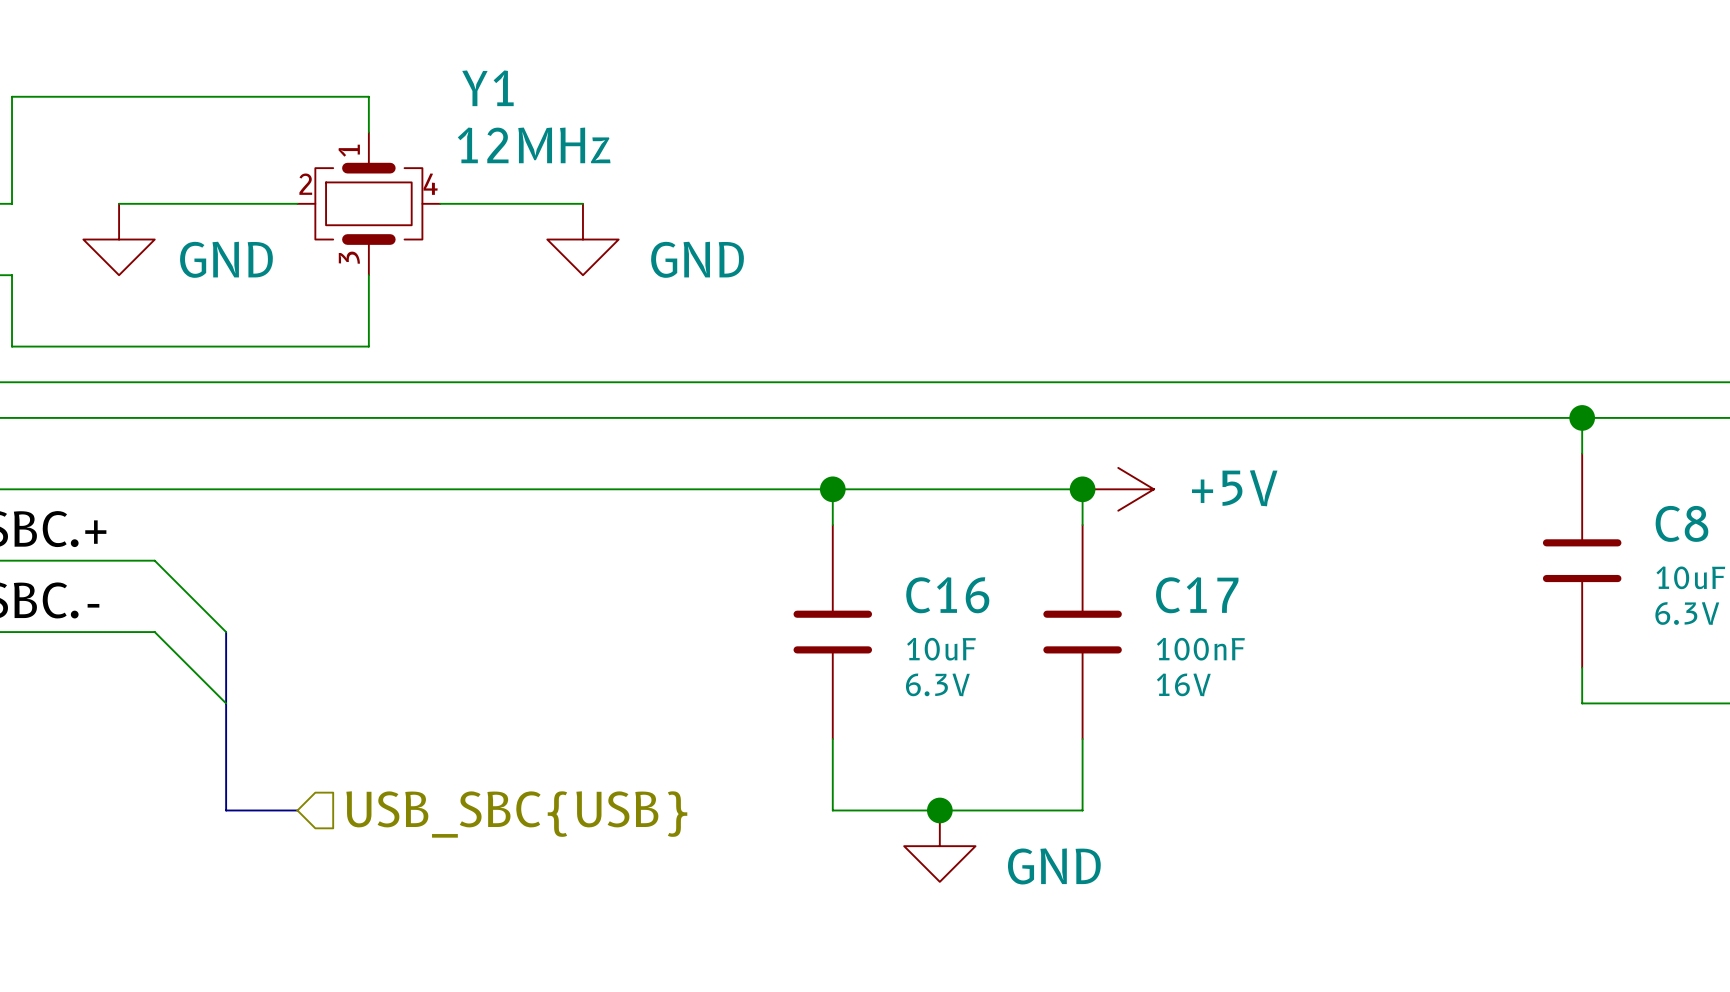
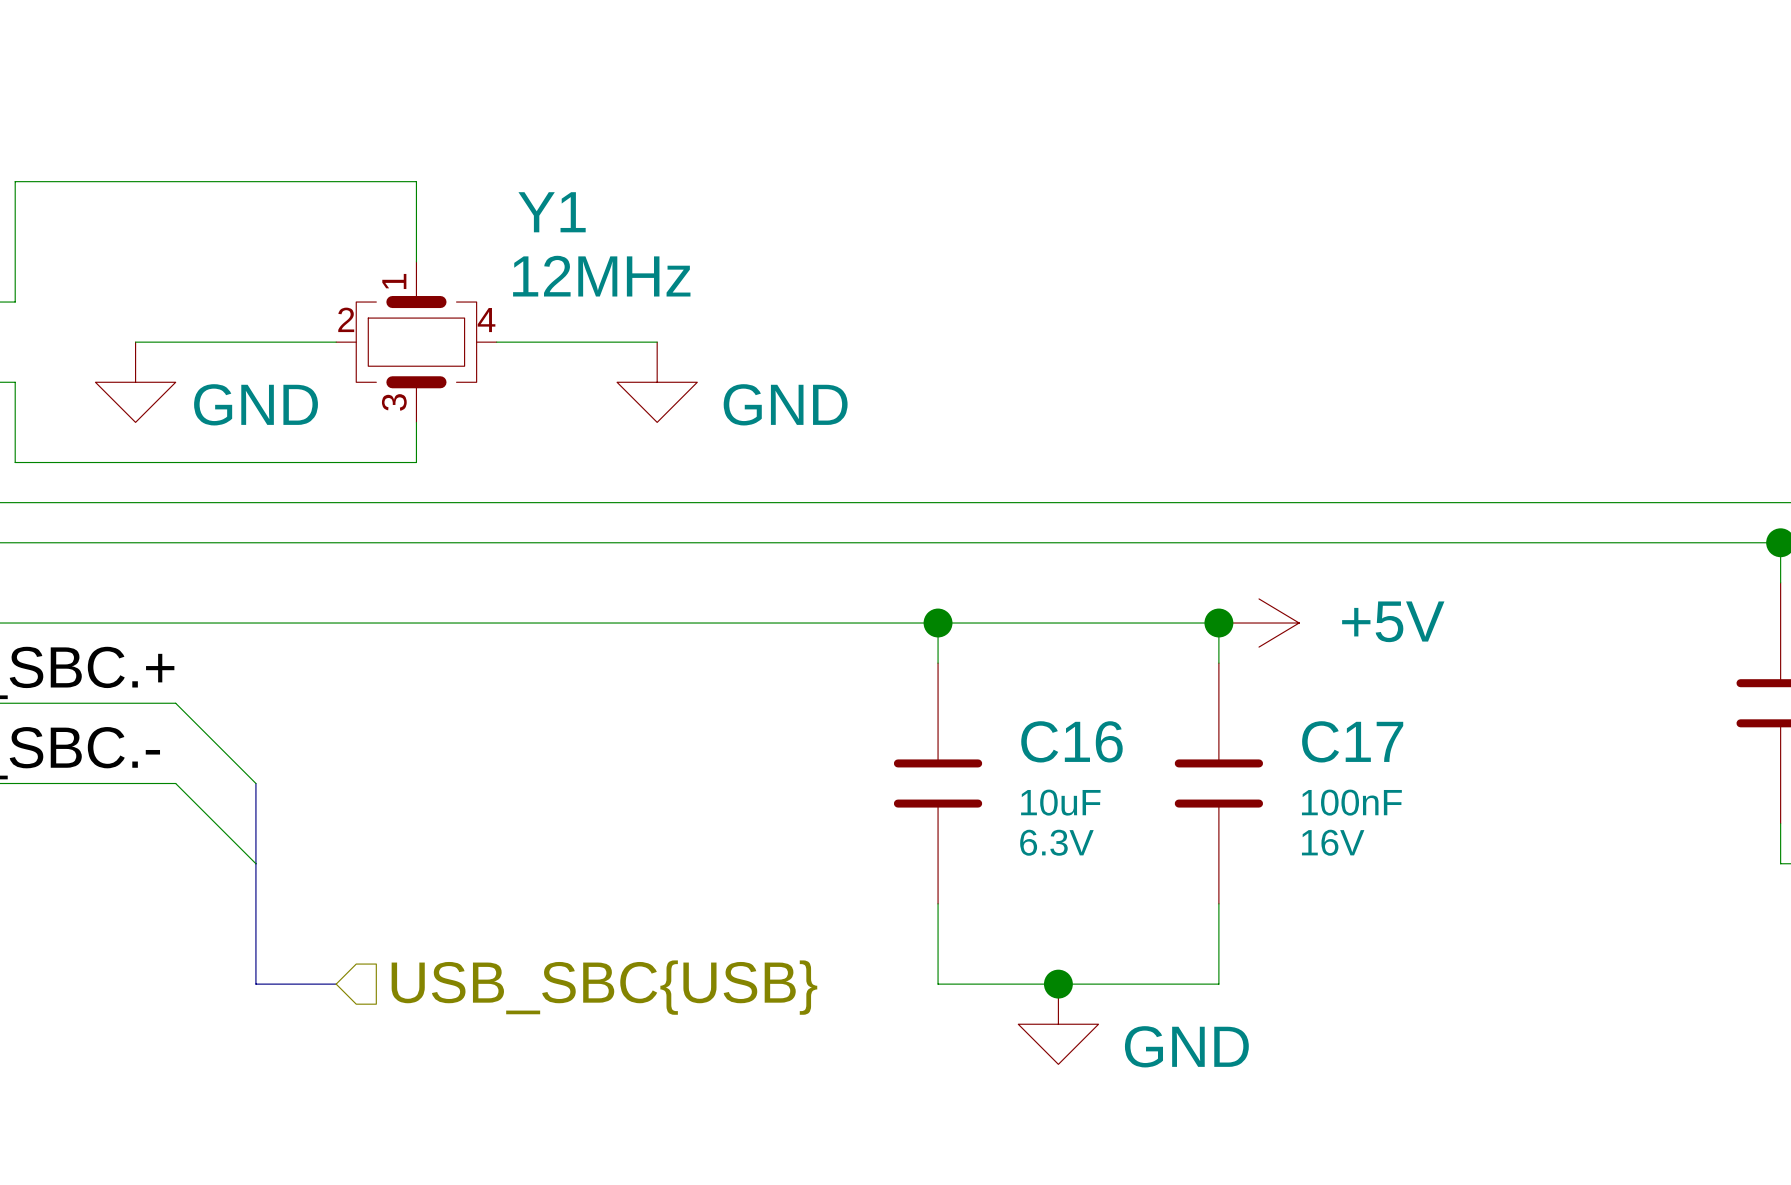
wire: (119, 203) (297, 203) -> (135, 342) (336, 342)
Y1 position: (368, 203) -> (416, 342)
wire: (440, 203) (582, 203) -> (496, 342) (657, 342)
power symbol position: GND (119, 239) -> GND (135, 382)
power symbol position: GND (582, 239) -> GND (657, 382)

